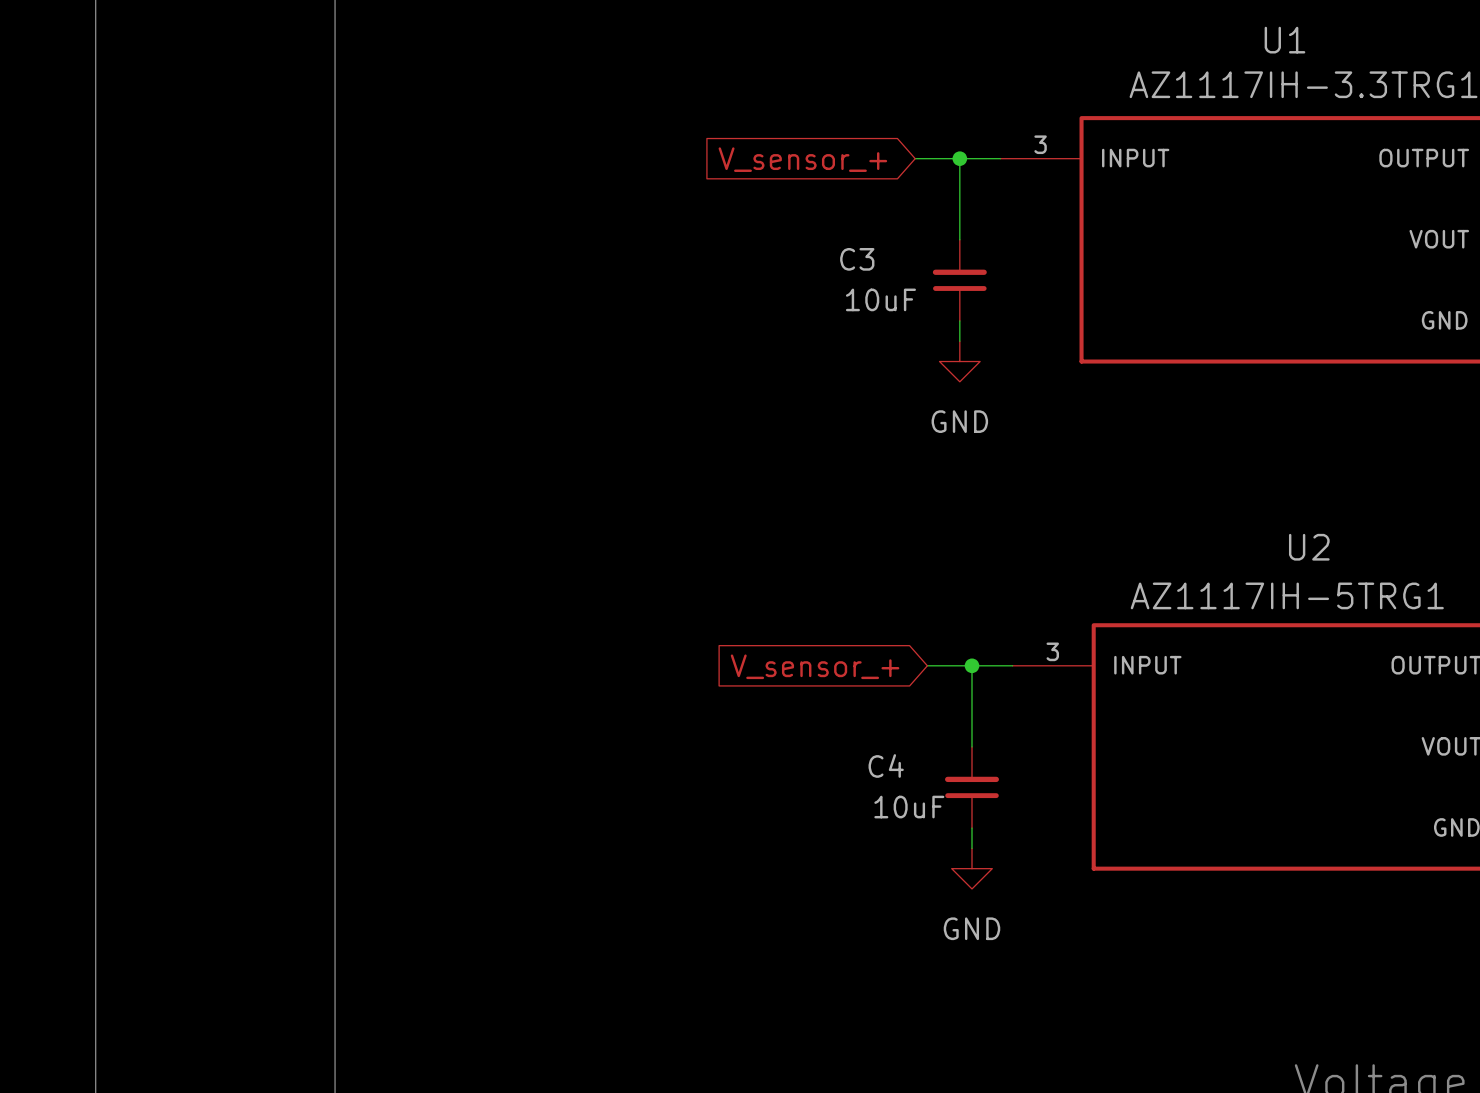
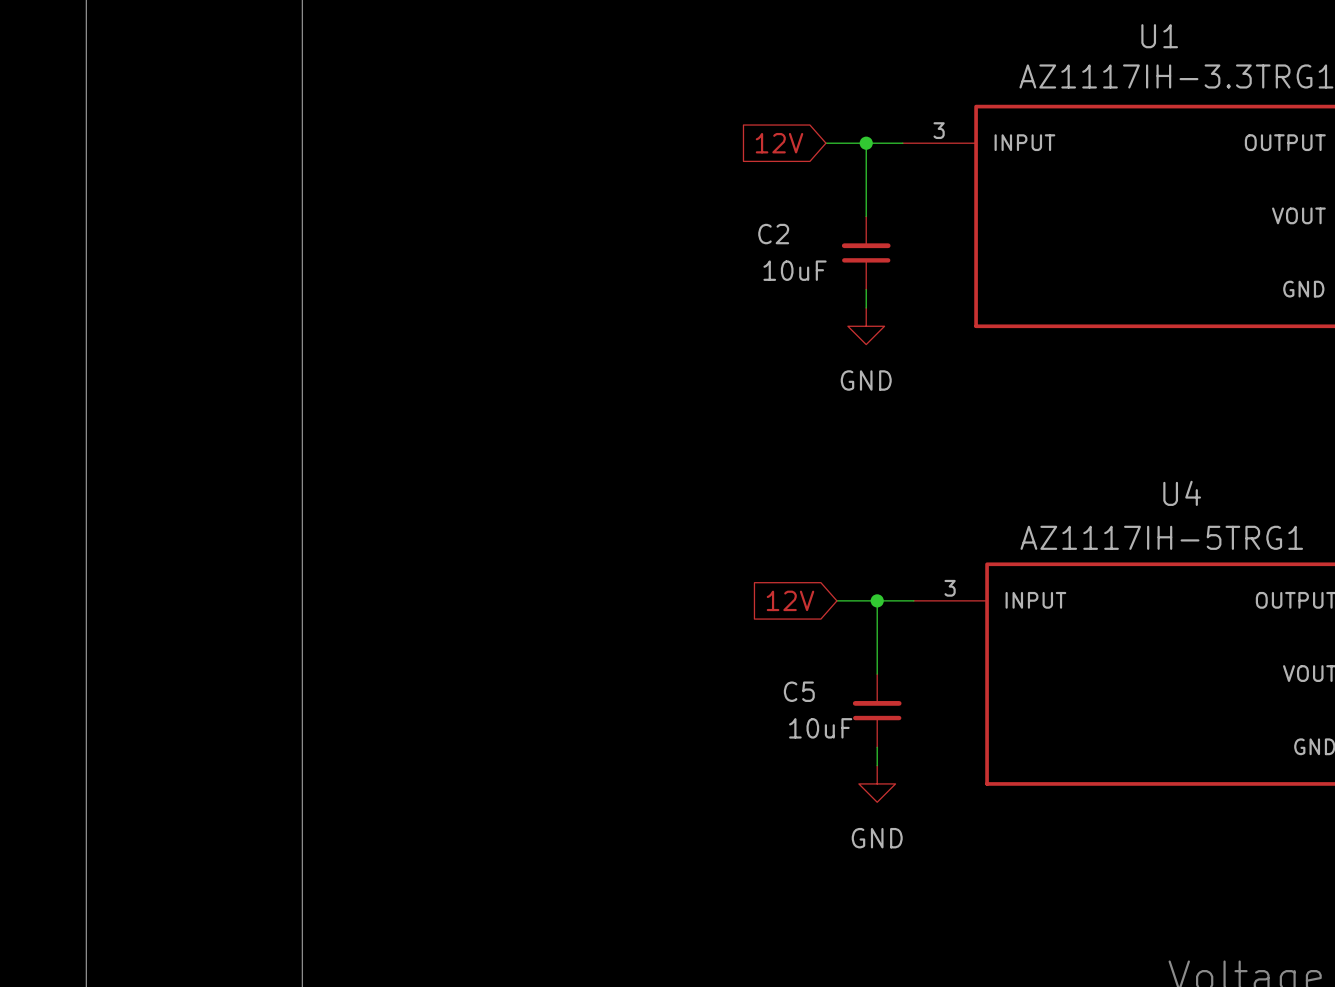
global label: V_sensor_+ (802, 159) -> 12V (779, 143)
C3 name: C3 (857, 259) -> C2 (773, 234)
U2 name: U2 (1309, 547) -> U4 (1182, 493)
global label: V_sensor_+ (815, 666) -> 12V (790, 600)
C4 name: C4 (886, 765) -> C5 (799, 691)

